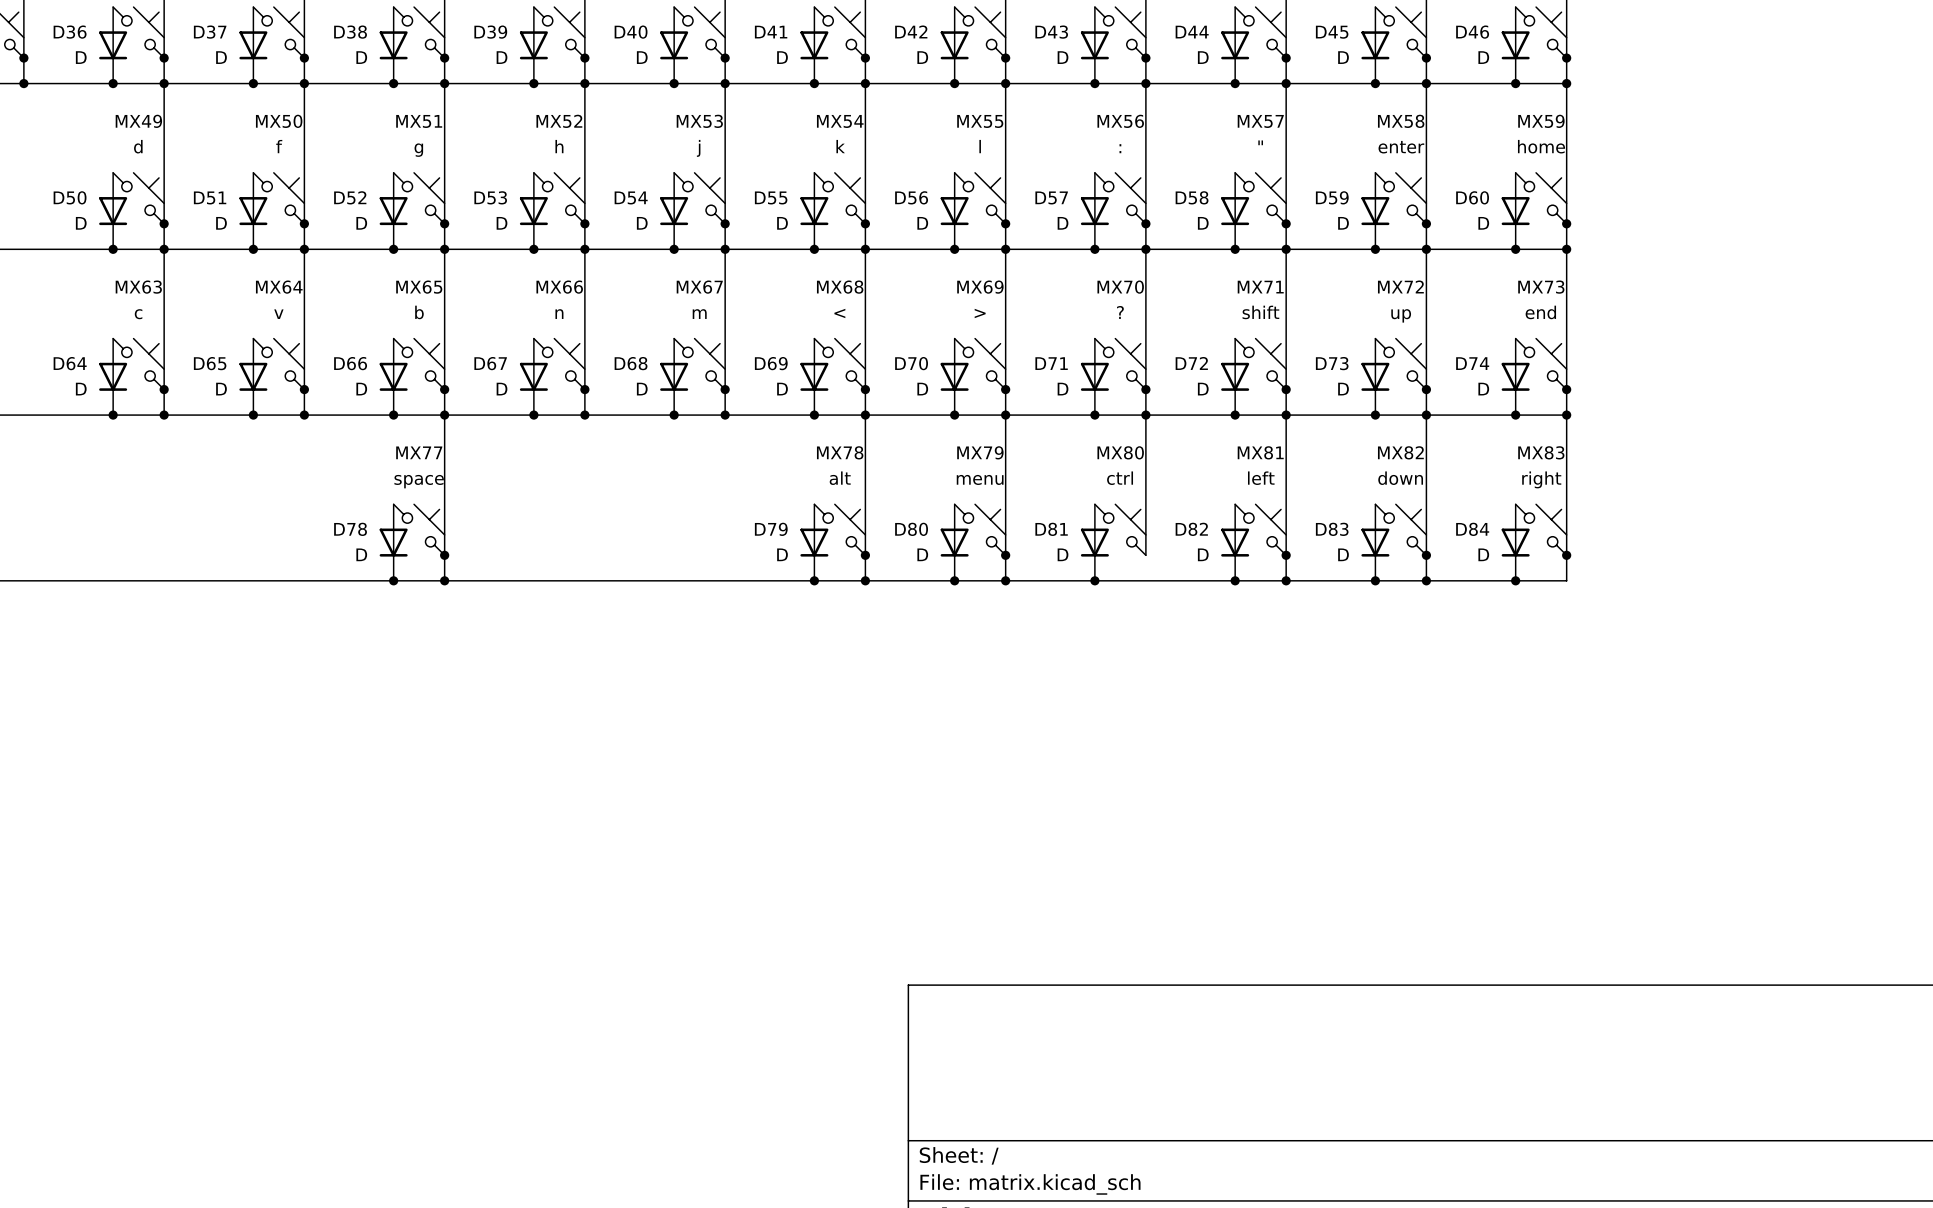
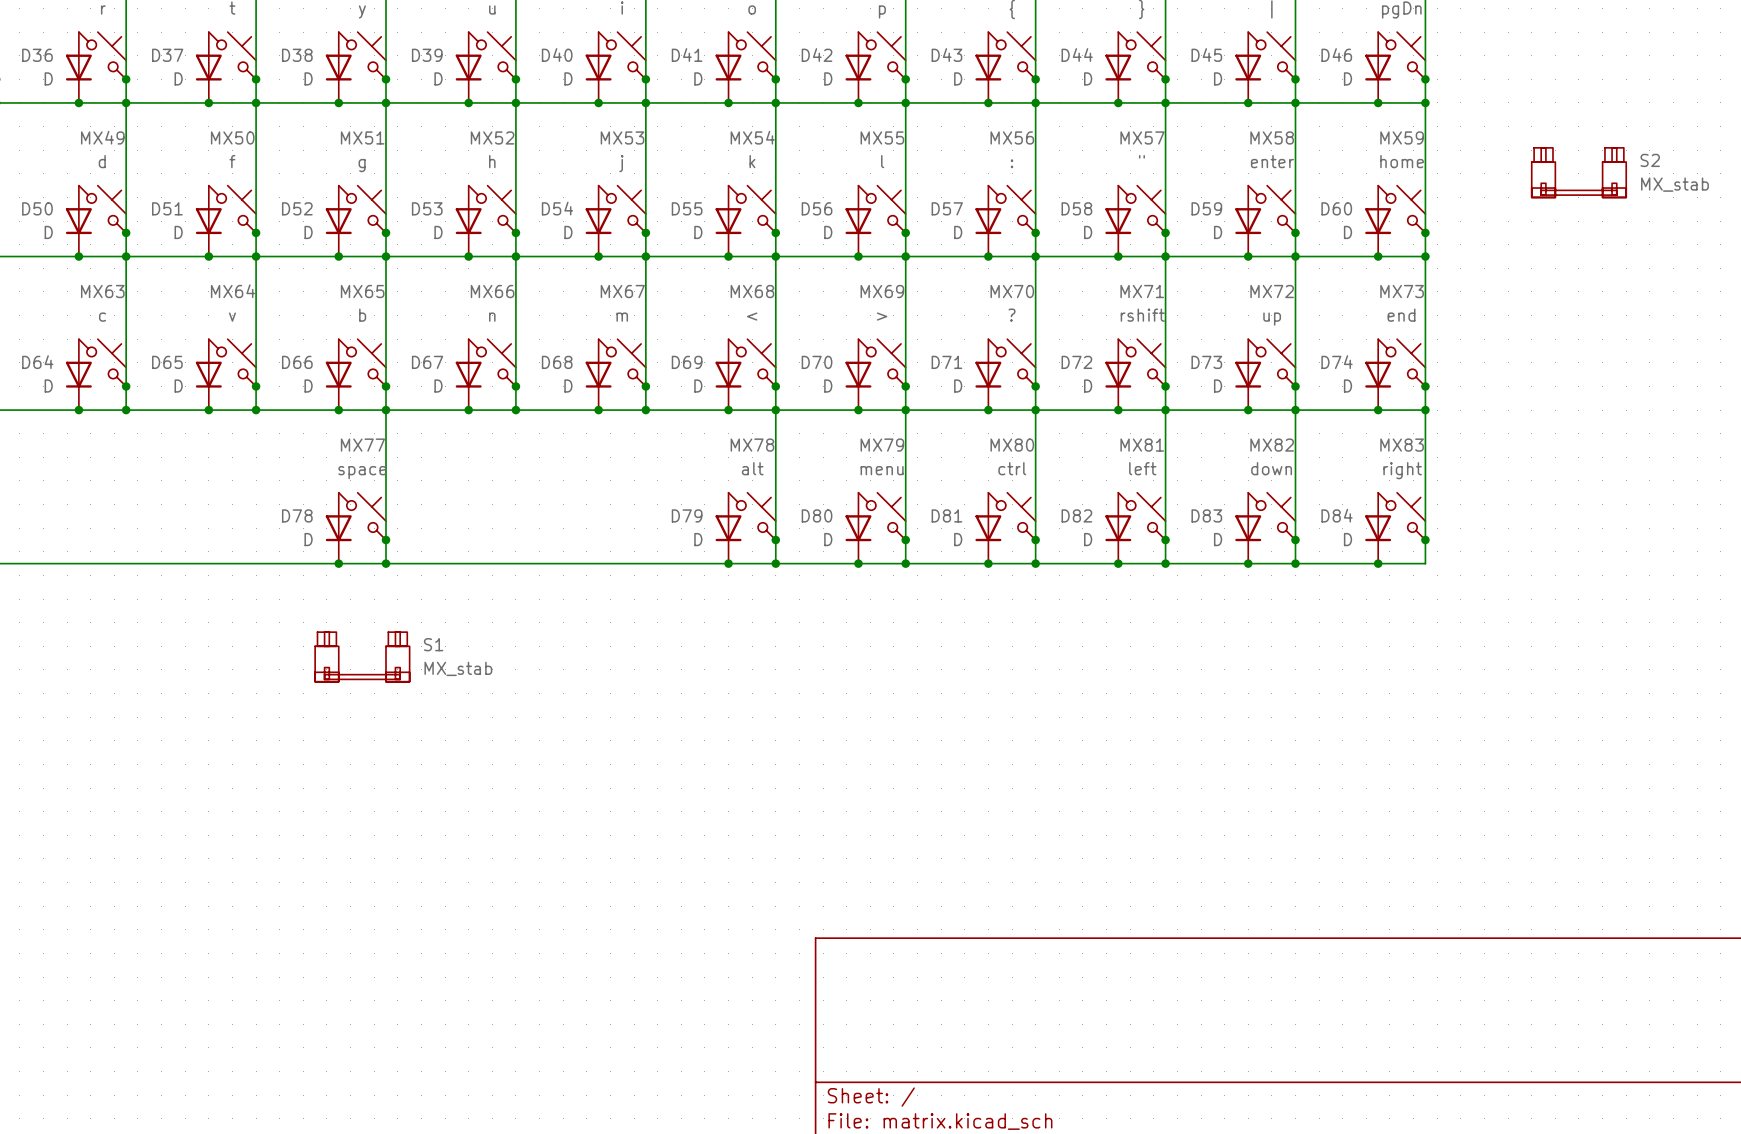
S2: none -> MX_stab (1578, 172)
MX71 value: shift (1260, 312) -> rshift (1142, 315)
wire: none -> (1035, 540) (1035, 563)
junction: none -> (1035, 540)
junction: none -> (1035, 563)
S1: none -> MX_stab (362, 656)

